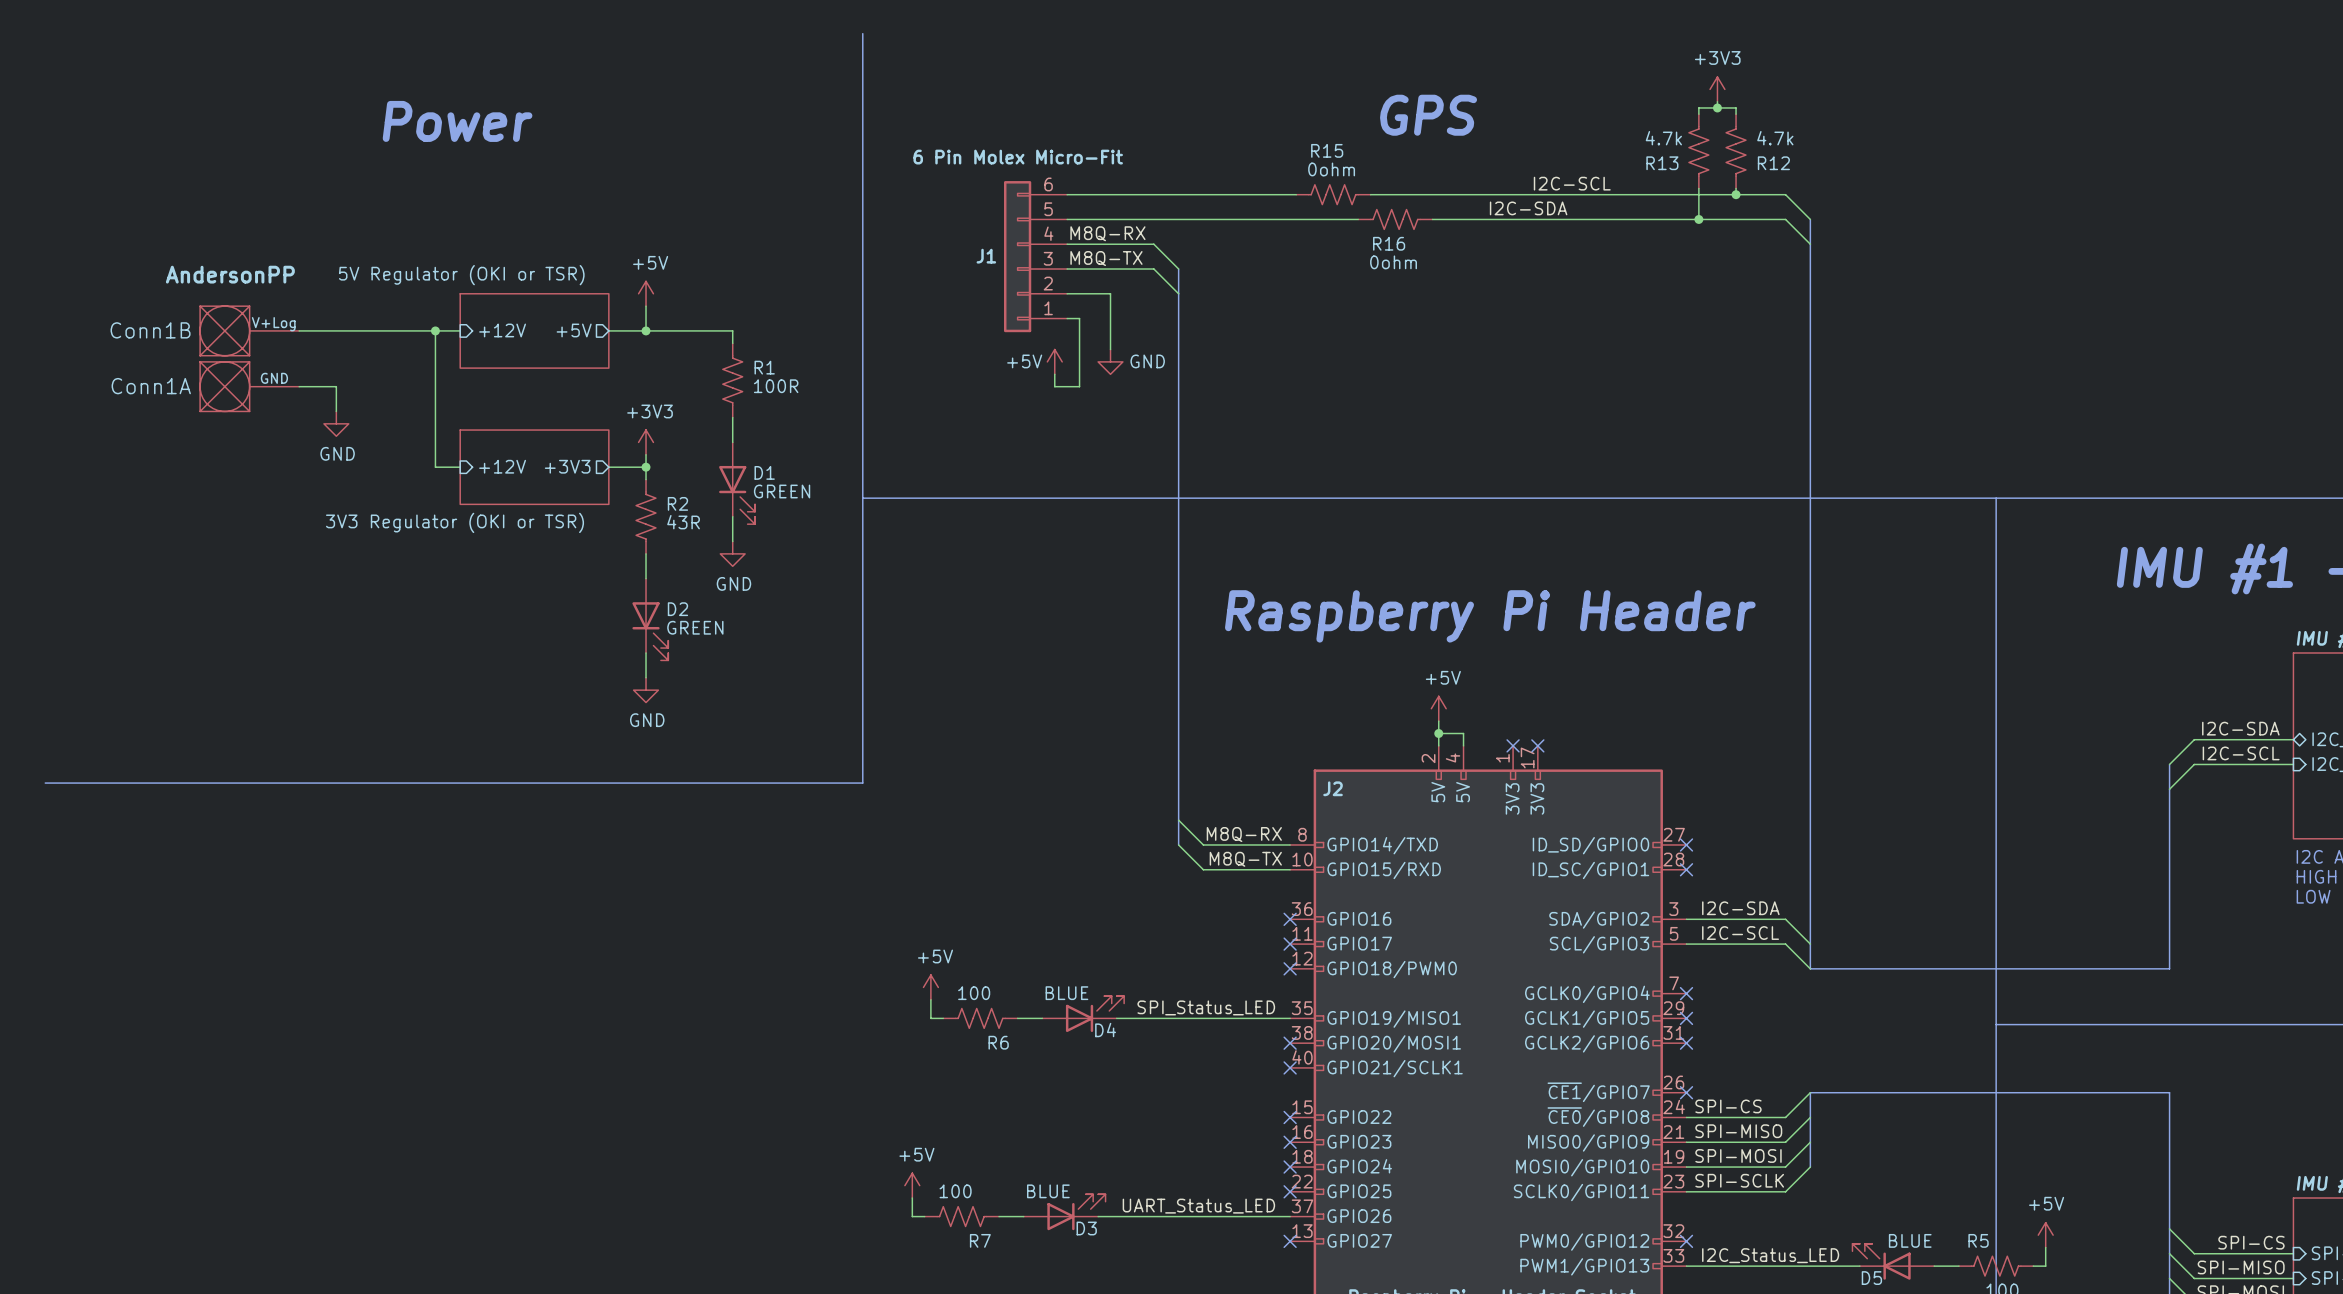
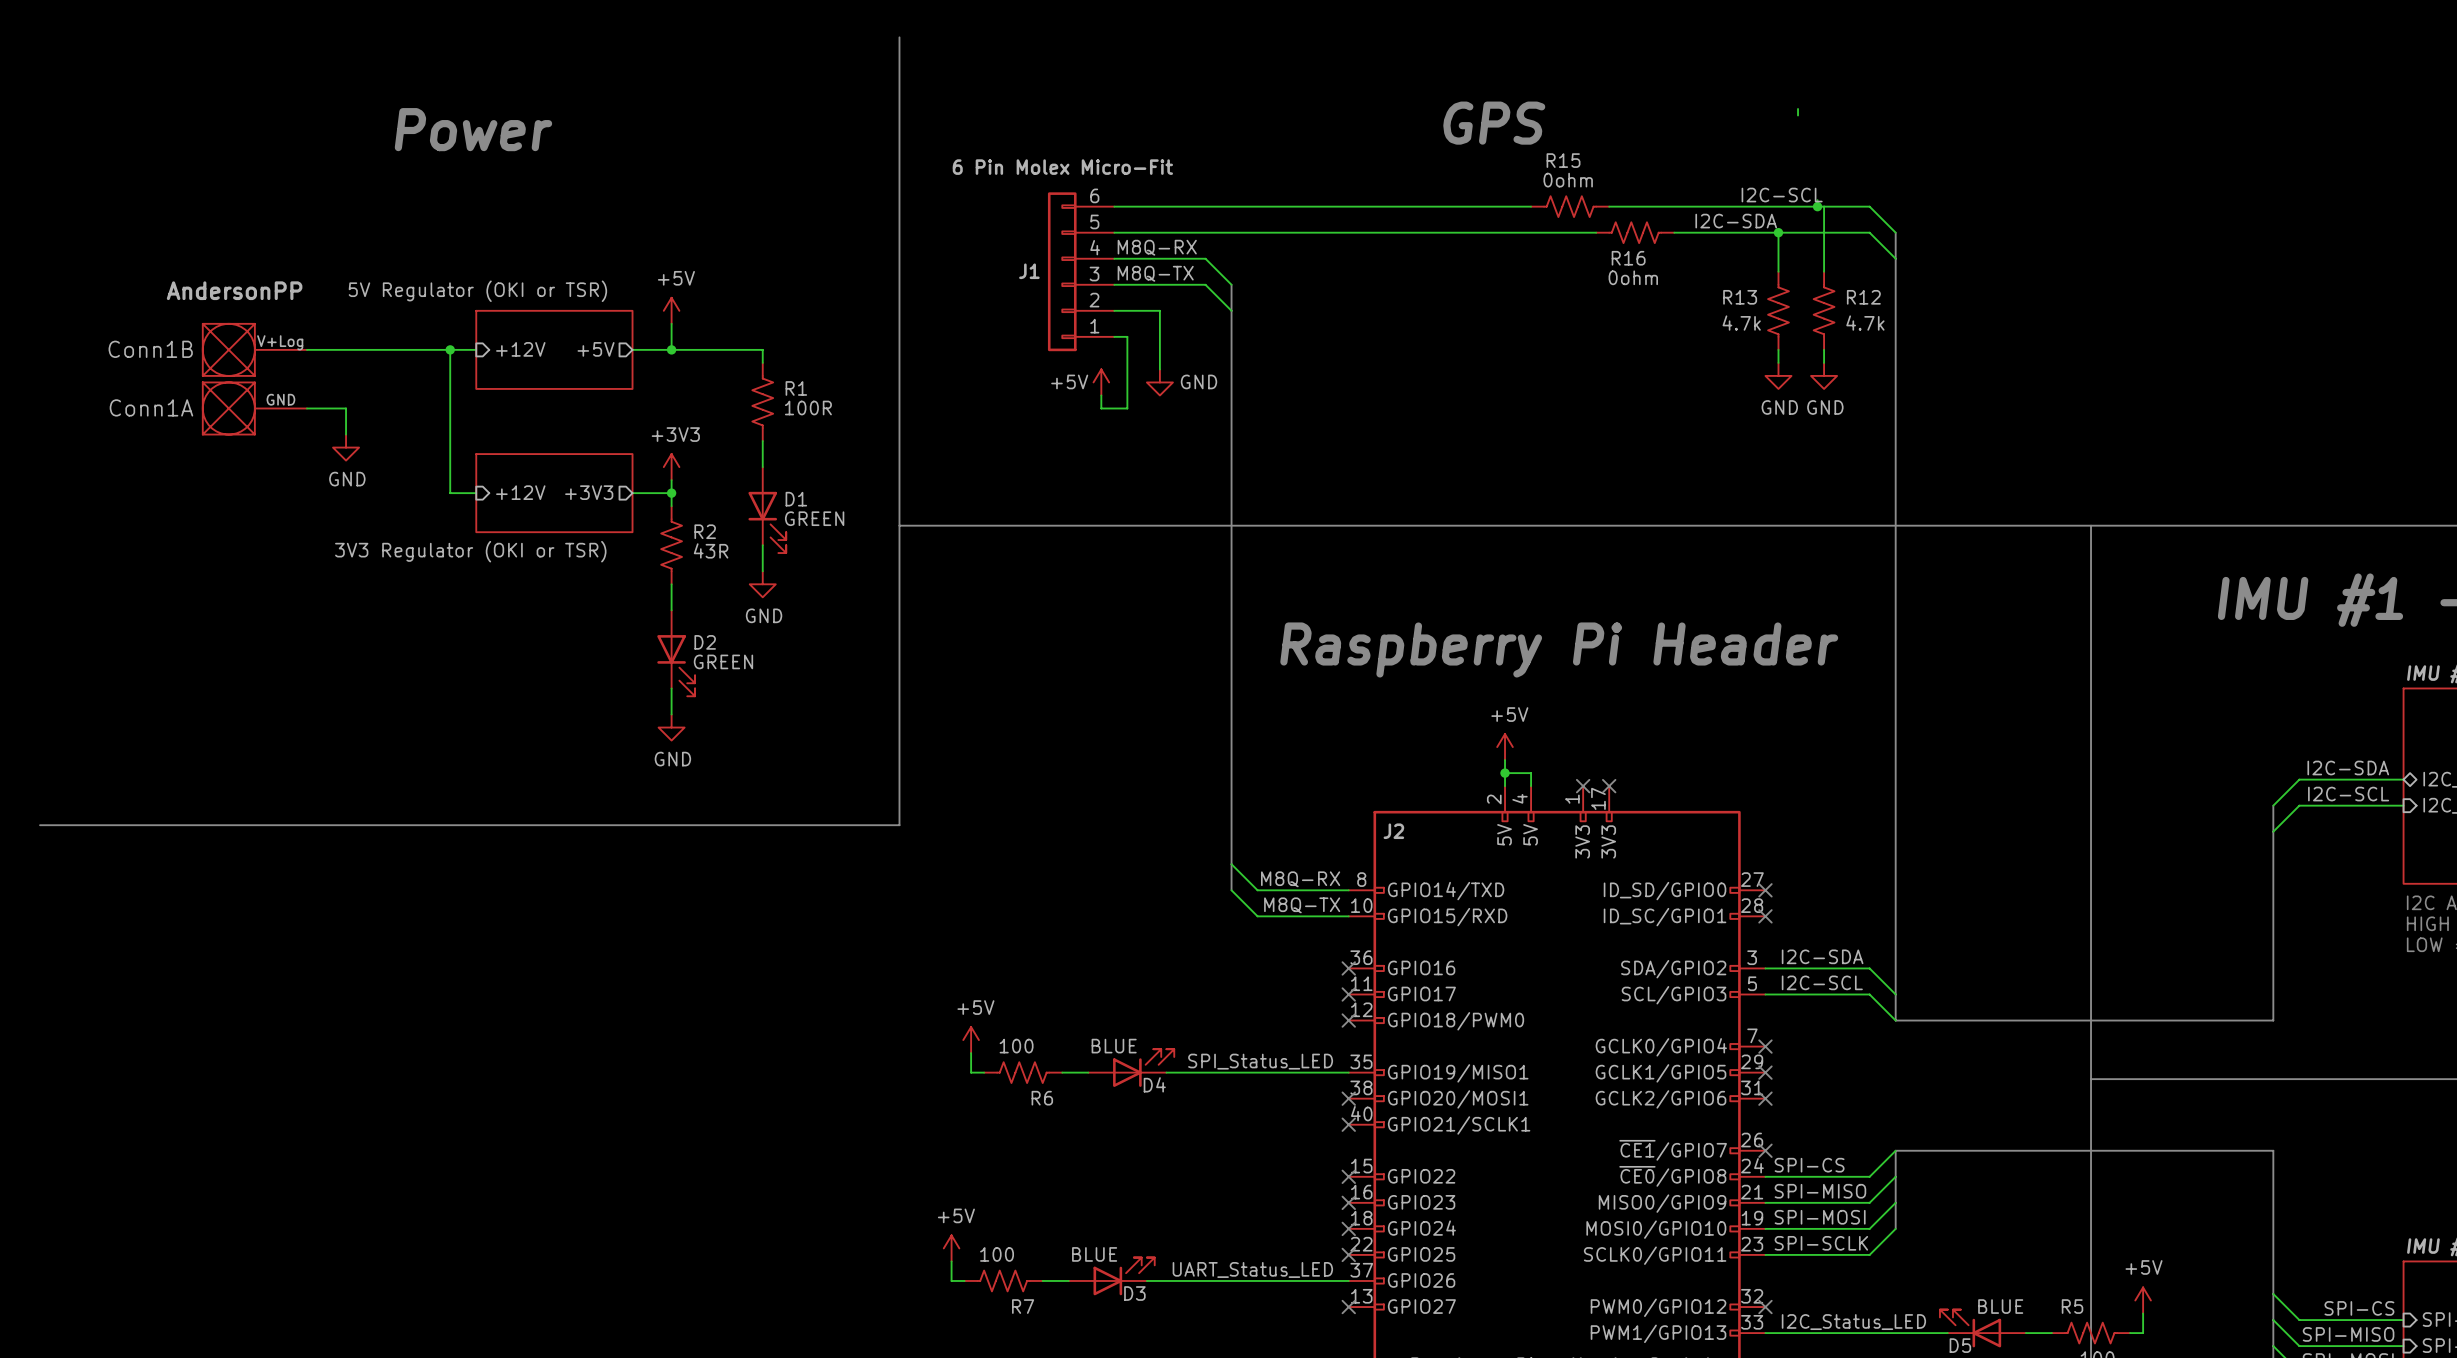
power symbol: +3V3 (1717, 89) -> none
junction: (1717, 107) -> none
wire: (1698, 114) (1698, 107) (1736, 107) (1736, 114) -> none
R13 value position: 4.7k (1663, 138) -> 4.7k (1741, 323)
R12 value position: 4.7k (1775, 138) -> 4.7k (1865, 323)
R13 flip: as is (1698, 151) -> left-right (1778, 310)
R13 position: (1698, 151) -> (1778, 310)
R12 flip: as is (1736, 151) -> left-right (1824, 310)
R12 position: (1736, 151) -> (1824, 310)
R13 name position: R13 (1662, 163) -> R13 (1740, 297)
R12 name position: R12 (1773, 163) -> R12 (1863, 297)
label position: I2C-SCL (1572, 183) -> I2C-SCL (1782, 195)
wire: (1698, 188) (1698, 219) -> (1778, 271) (1778, 232)
R15 position: (1333, 194) -> (1570, 206)
wire: none -> (1824, 206) (1824, 271)
label position: I2C-SDA (1528, 208) -> I2C-SDA (1736, 221)
R16 position: (1395, 219) -> (1635, 232)
wire: none -> (1778, 349) (1778, 362)
wire: none -> (1824, 349) (1824, 362)
power symbol: none -> GND (1778, 375)
power symbol: none -> GND (1824, 375)

